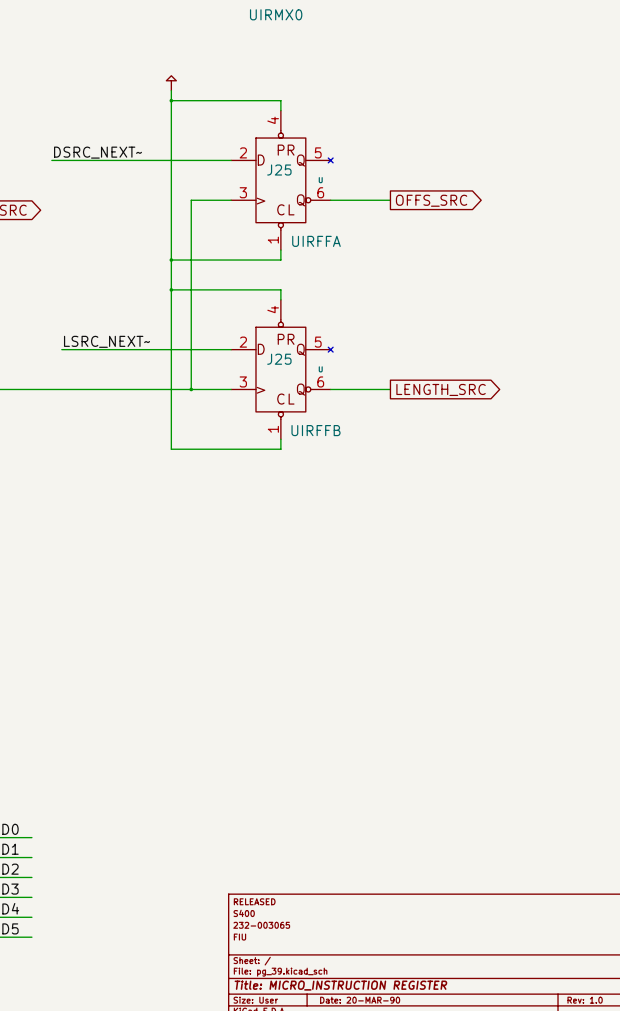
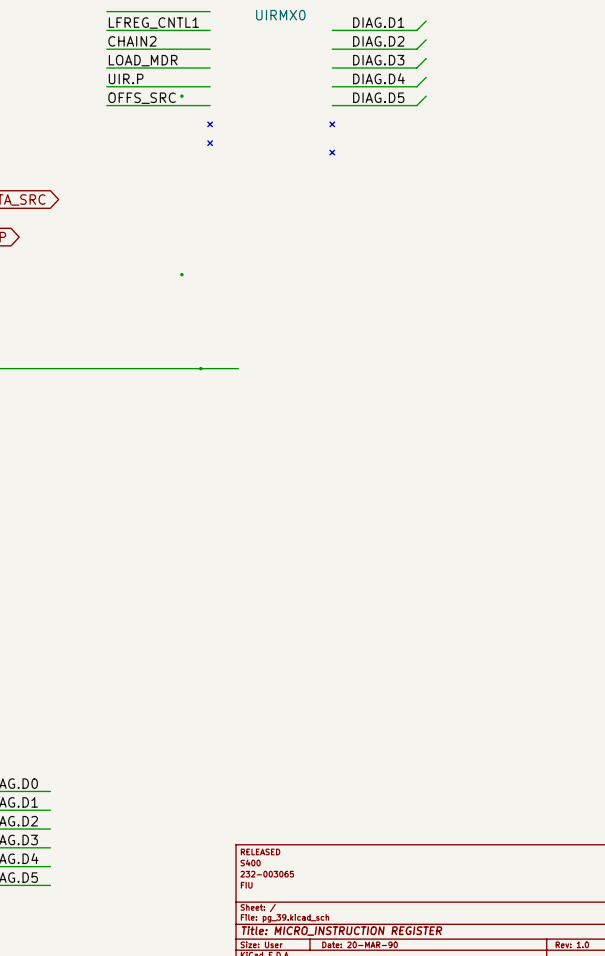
wire: none -> (106, 11) (210, 11)
wire: none -> (426, 21) (416, 30) (332, 30)
label: none -> DIAG.D1 (378, 22)
label: none -> LFREG_CNTL1 (153, 23)
wire: none -> (106, 30) (210, 30)
wire: none -> (426, 39) (416, 49) (332, 49)
label: none -> CHAIN2 (132, 41)
label: none -> DIAG.D2 (378, 41)
wire: none -> (106, 49) (210, 49)
wire: none -> (426, 58) (416, 67) (332, 67)
label: none -> LOAD_MDR (143, 60)
label: none -> DIAG.D3 (378, 60)
wire: none -> (106, 67) (210, 67)
wire: none -> (426, 77) (416, 86) (332, 86)
label: none -> UIR.P (126, 78)
label: none -> DIAG.D4 (378, 78)
power symbol: (171, 83) -> none
wire: none -> (106, 86) (210, 86)
wire: (171, 90) (171, 449) (280, 449) (280, 439) -> none
wire: (171, 100) (280, 100) (280, 110) -> none
wire: none -> (426, 96) (416, 105) (332, 105)
label: none -> OFFS_SRC (142, 98)
label: none -> DIAG.D5 (378, 97)
wire: none -> (106, 105) (210, 105)
no-connect mark: none -> (210, 124)
no-connect mark: none -> (332, 124)
no-connect mark: none -> (210, 143)
label: DSRC_NEXT~ (98, 152) -> none
wire: (51, 160) (231, 160) -> none
part: (280, 180) -> none
wire: (231, 200) (191, 200) (191, 389) -> none
wire: (330, 200) (390, 200) -> none
global label: OFFS_SRC (431, 200) -> none
wire: (280, 250) (280, 260) (171, 260) -> none
junction: (171, 260) -> none
wire: (171, 289) (280, 289) (280, 299) -> none
label: LSRC_NEXT~ (107, 341) -> none
wire: (61, 349) (231, 349) -> none
no-connect mark: (330, 349) -> none
part: (280, 369) -> none
wire: (330, 389) (390, 389) -> none
global label: LENGTH_SRC (441, 389) -> none

